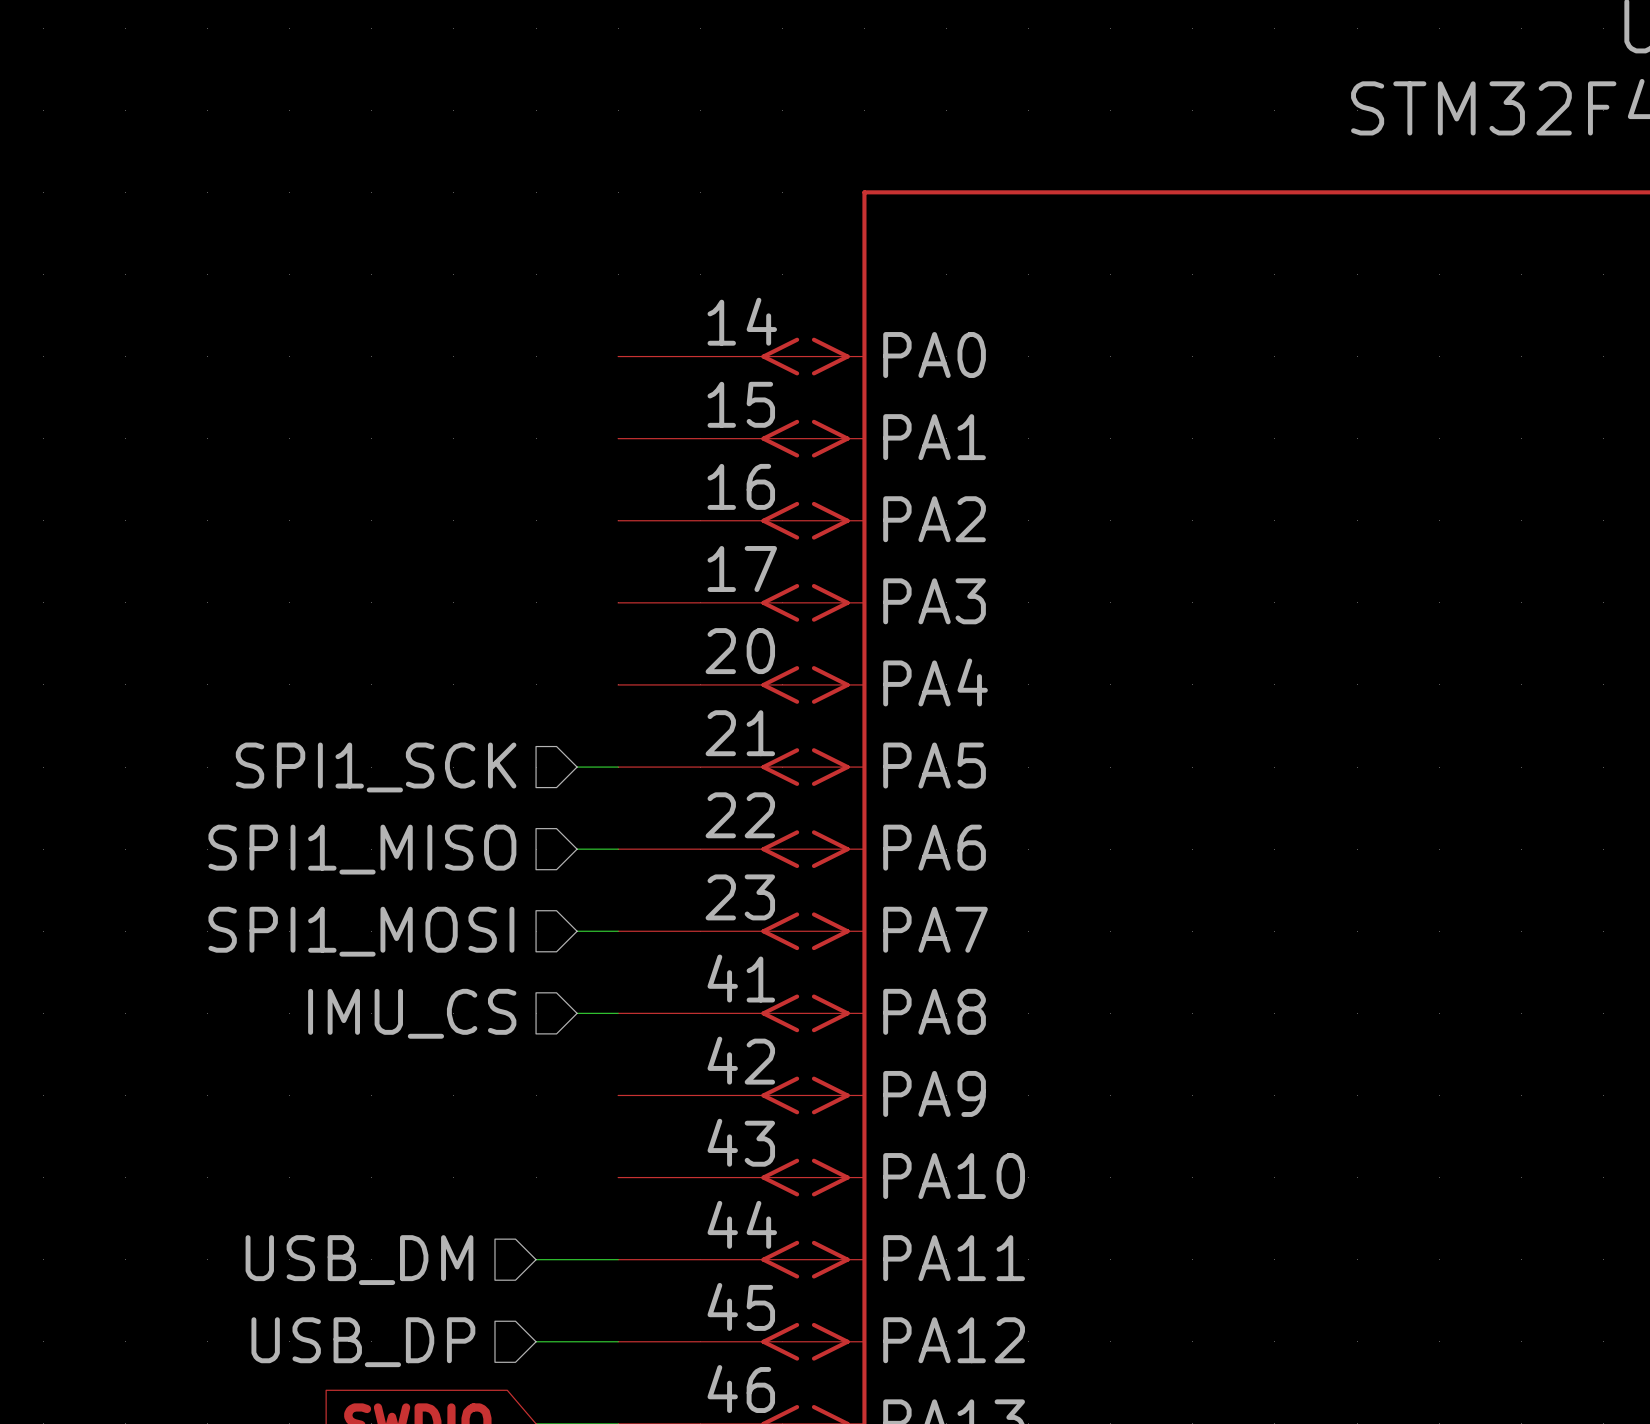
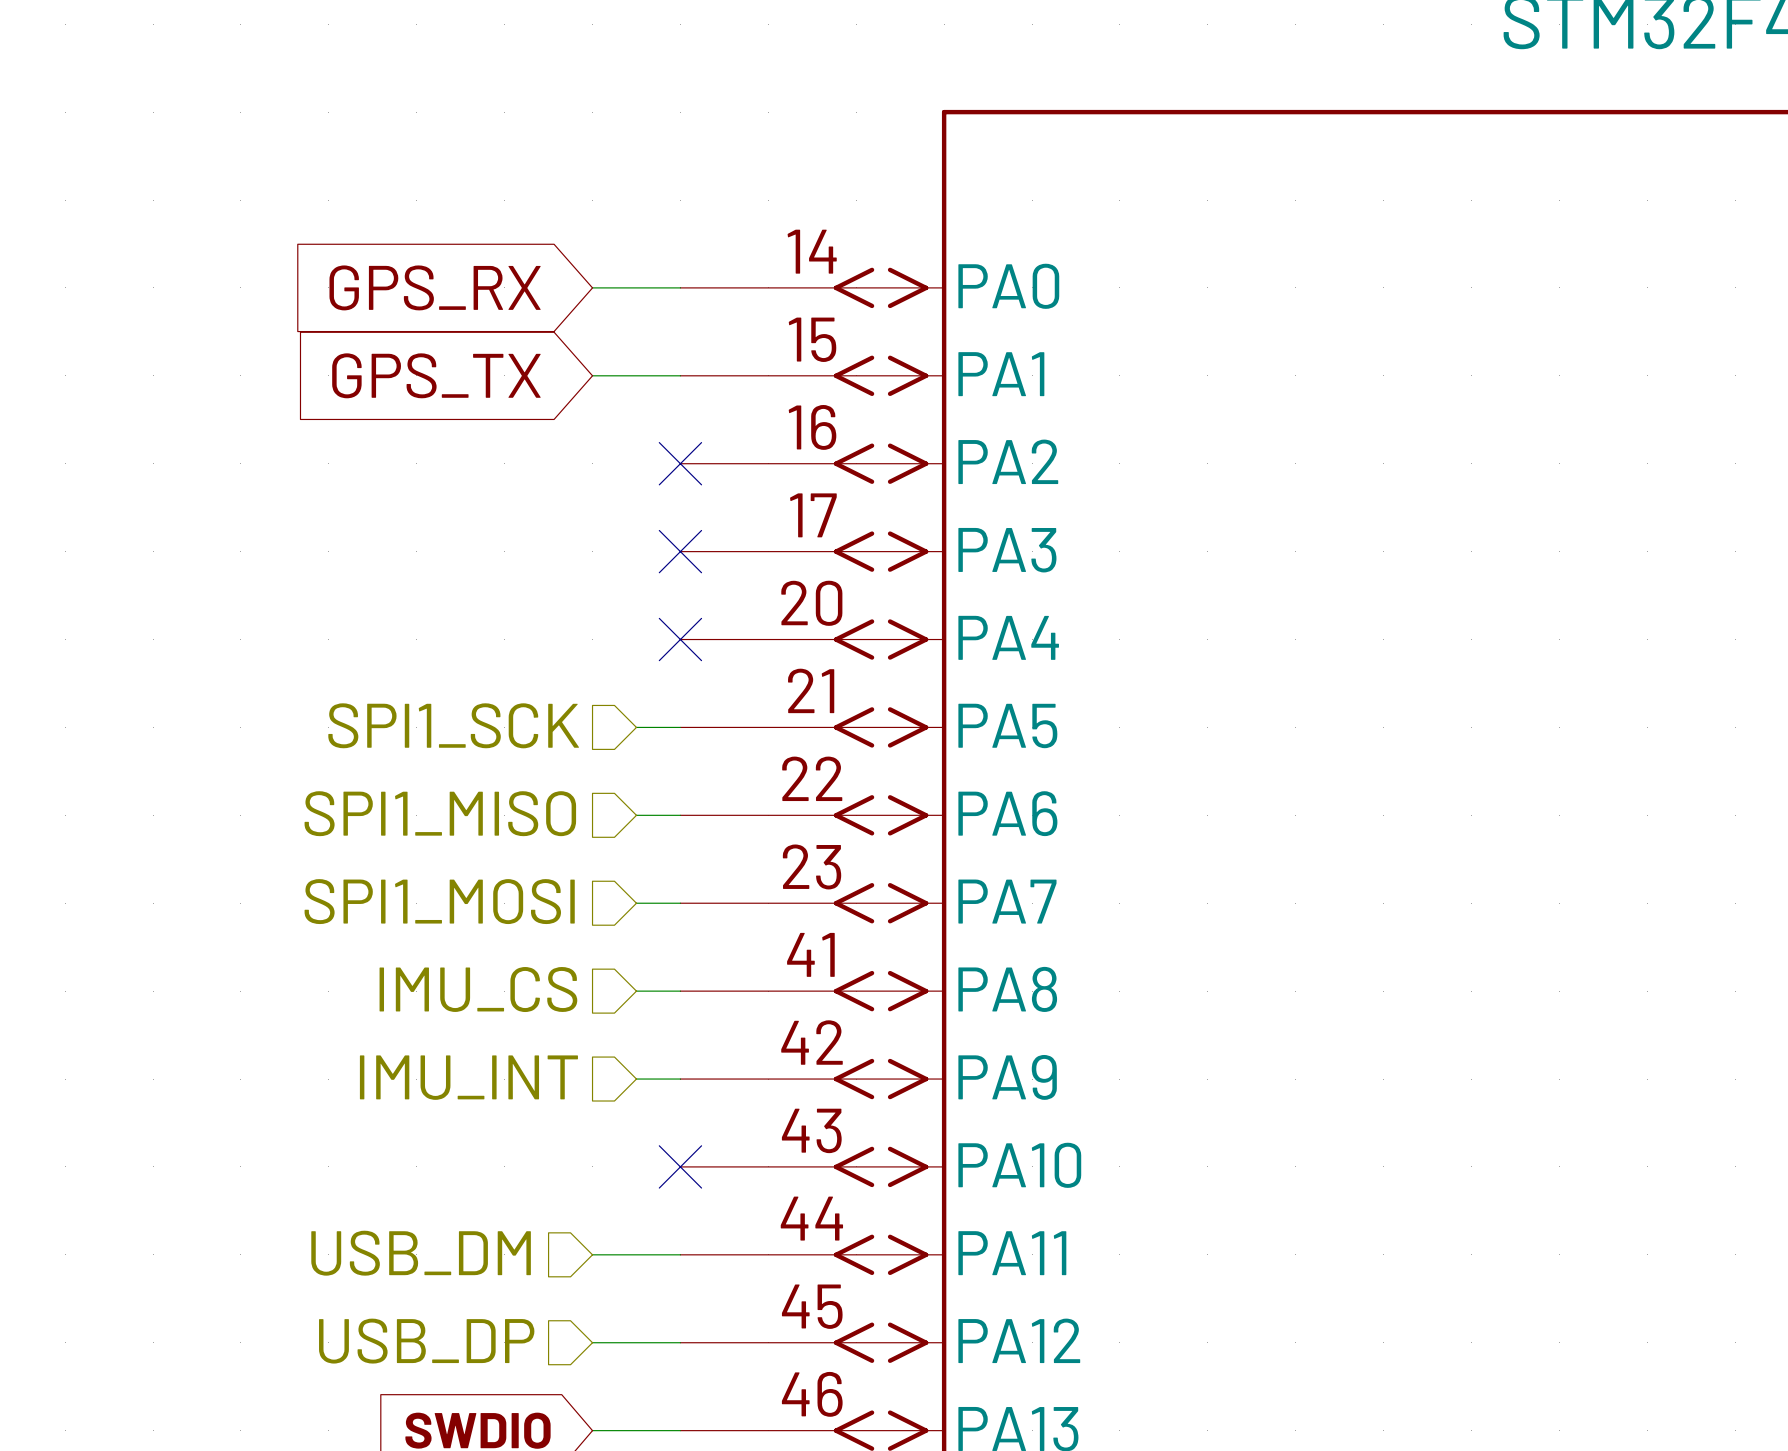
wire: none -> (592, 287) (680, 287)
global label: none -> GPS_RX (435, 287)
wire: none -> (592, 375) (680, 375)
global label: none -> GPS_TX (436, 375)
no-connect mark: none -> (680, 463)
no-connect mark: none -> (680, 551)
no-connect mark: none -> (680, 639)
hierarchical label: none -> IMU_INT (468, 1077)
wire: none -> (636, 1079) (680, 1079)
no-connect mark: none -> (680, 1166)

